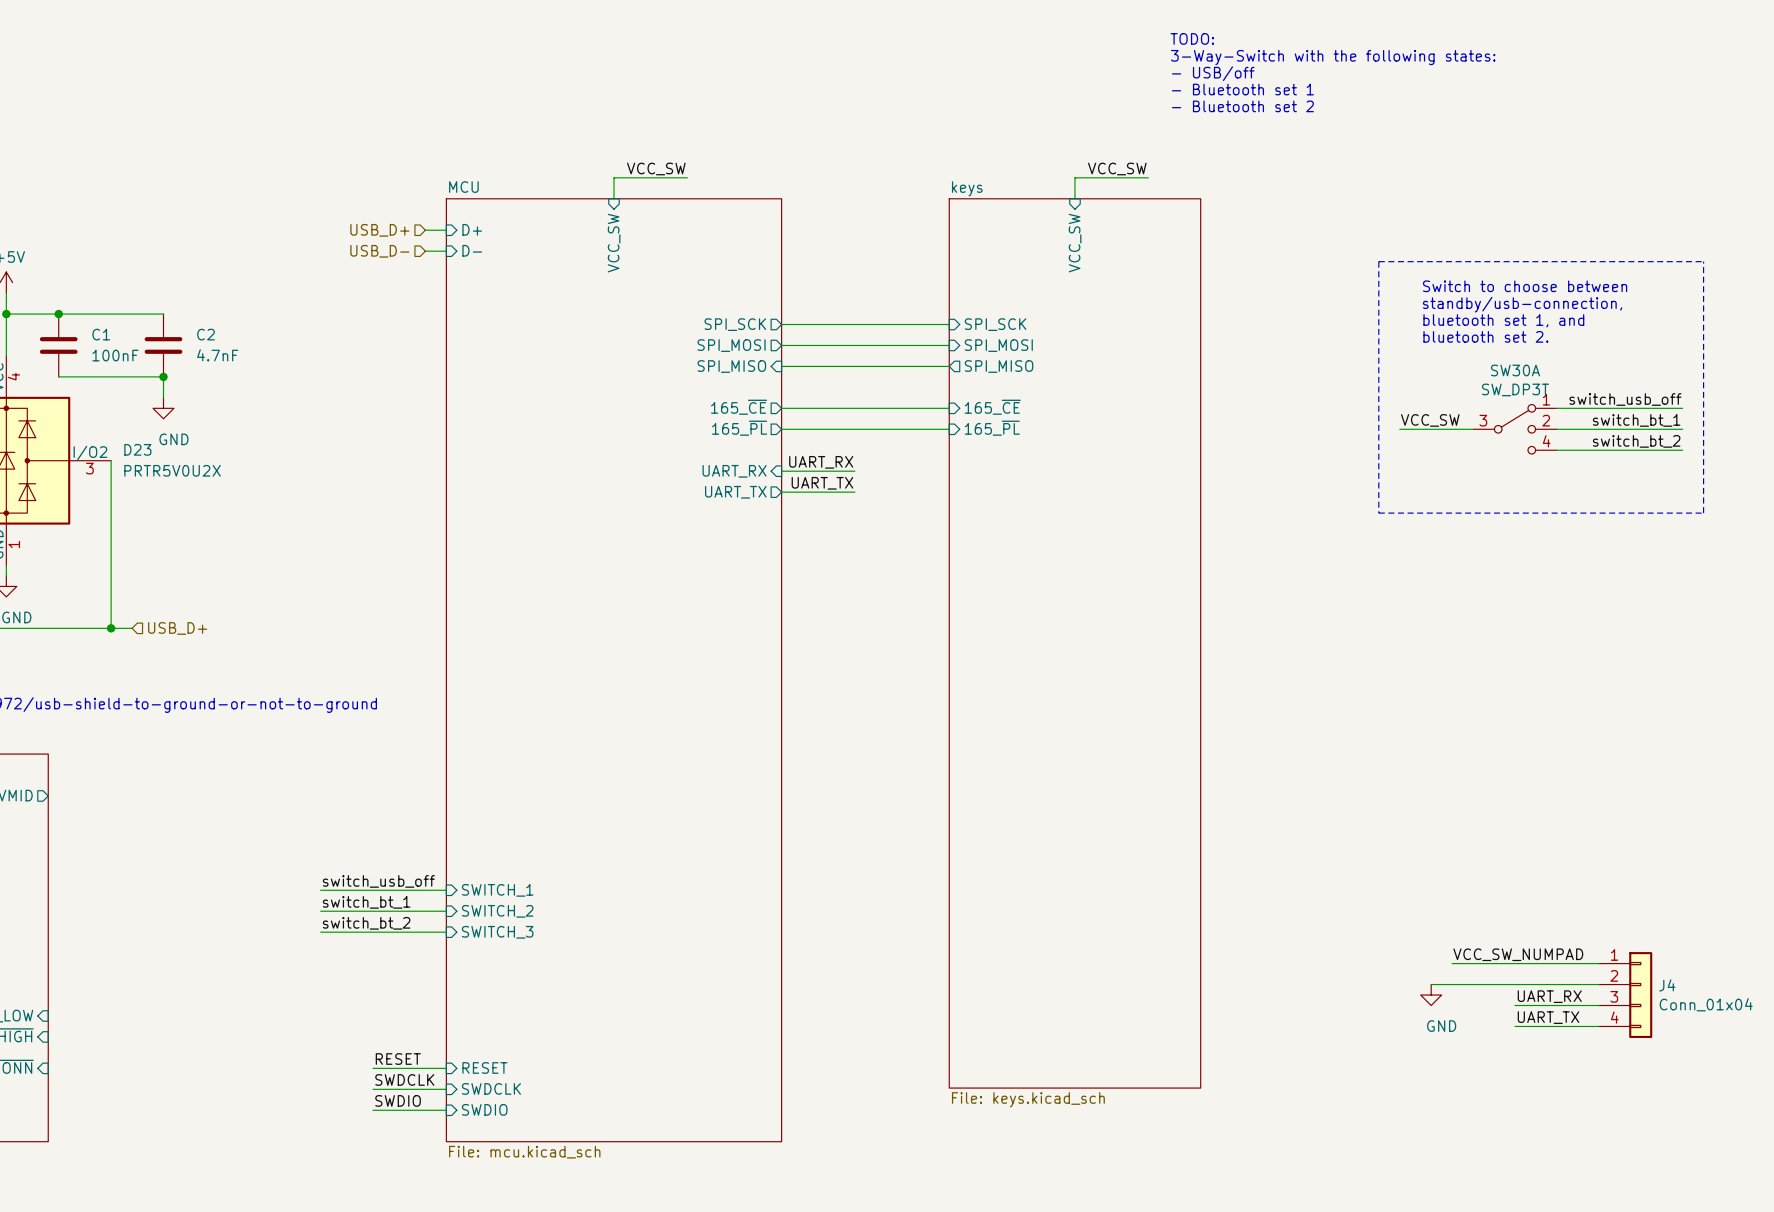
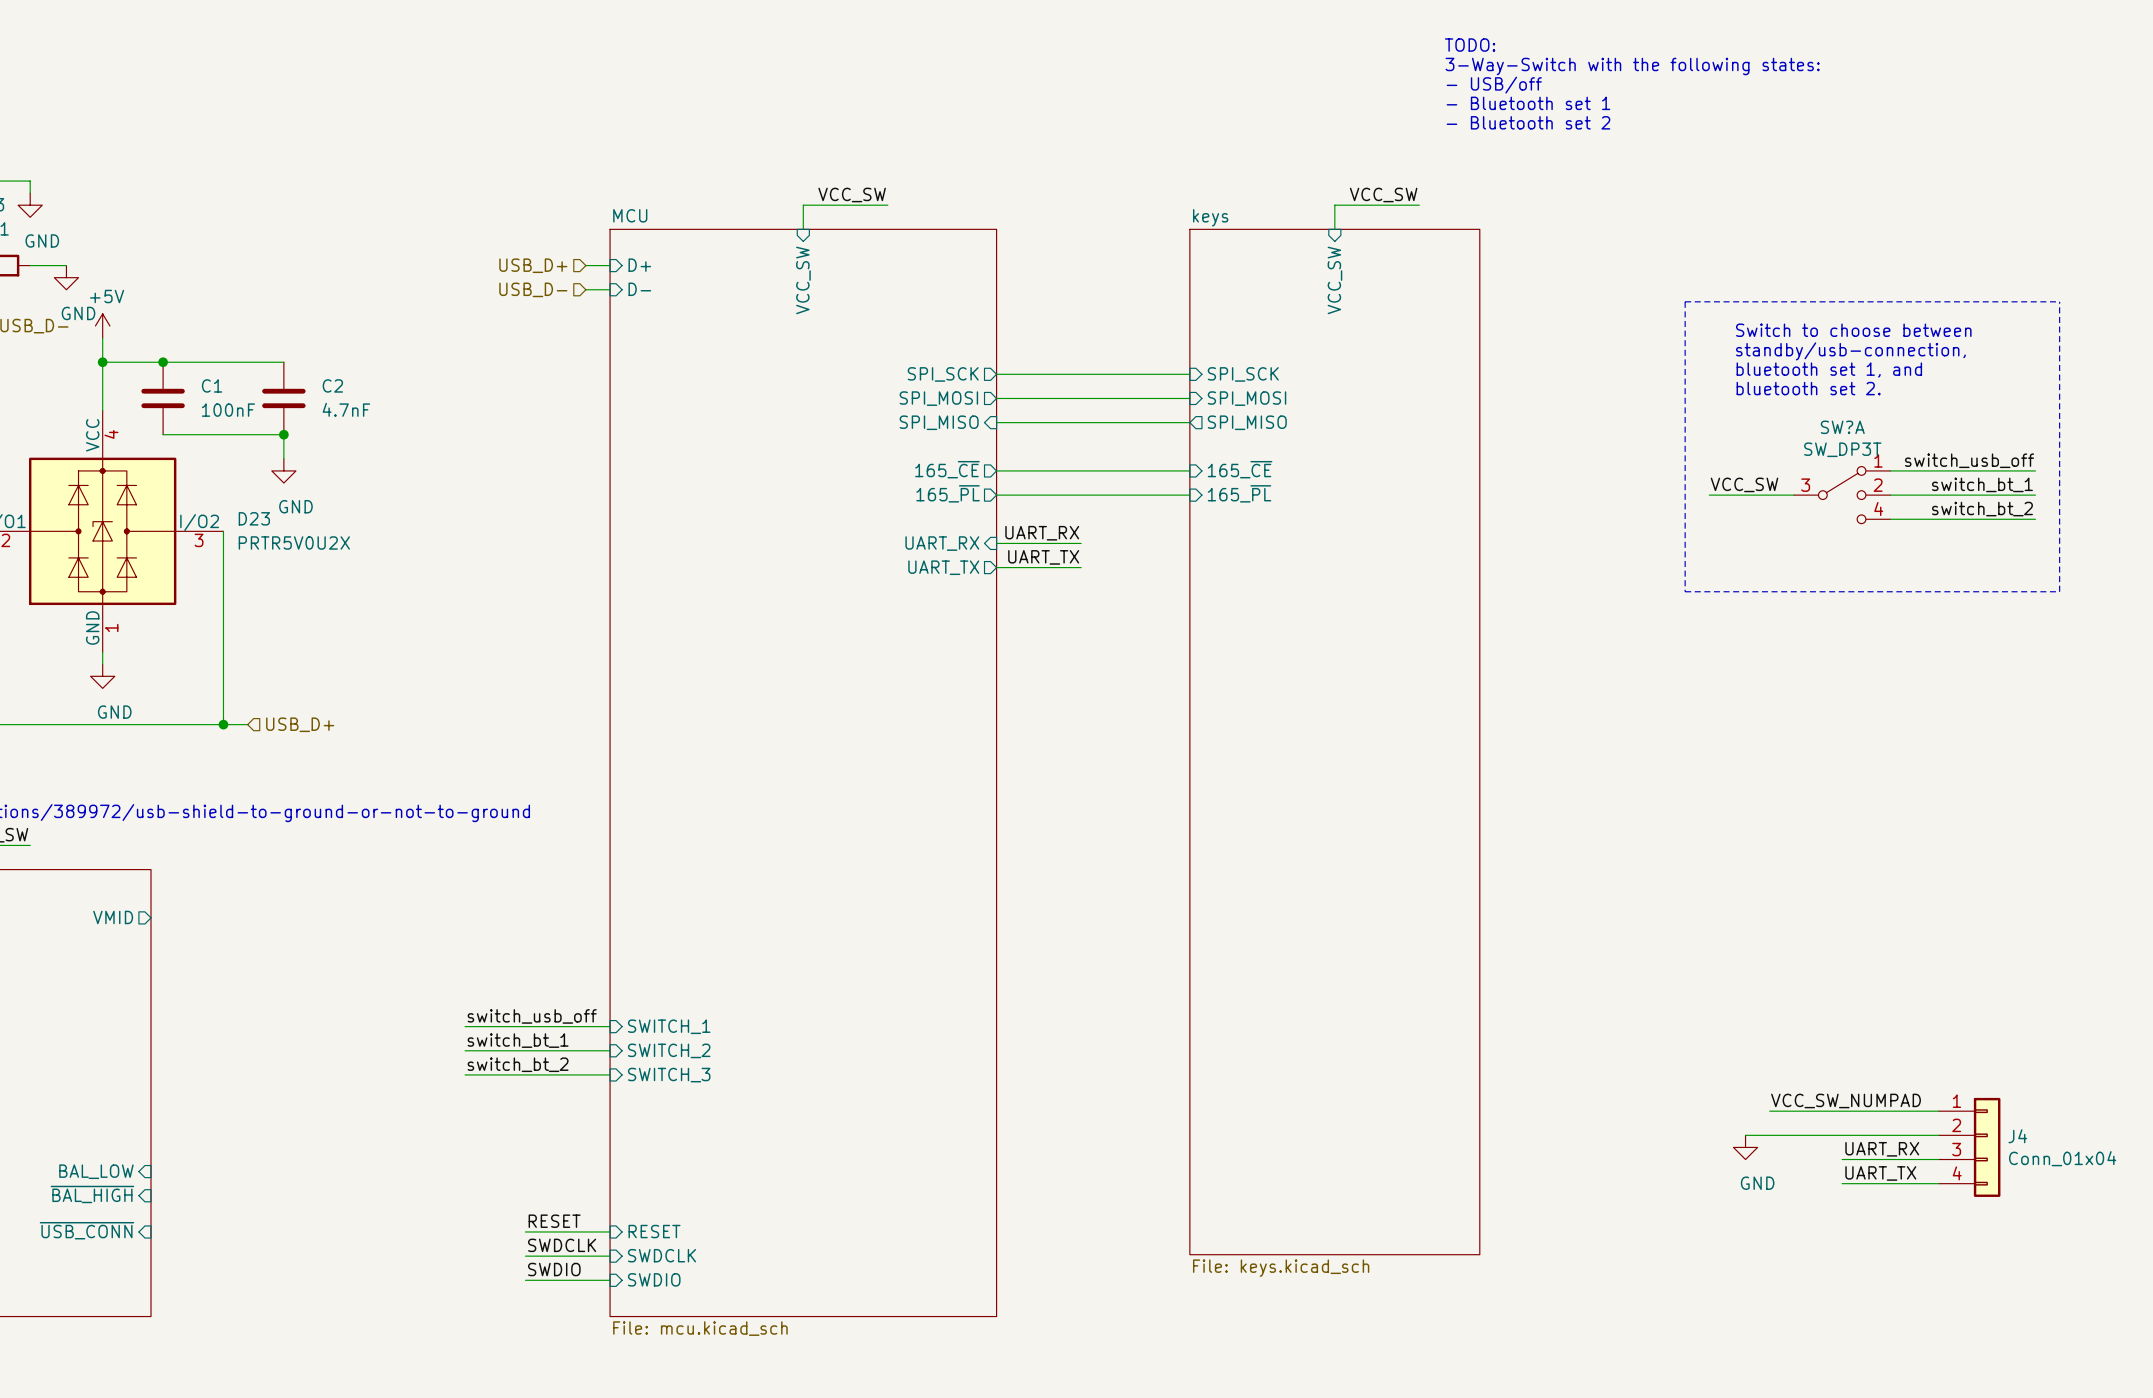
SW30A name: SW30A (1515, 370) -> SW?A (1842, 427)

